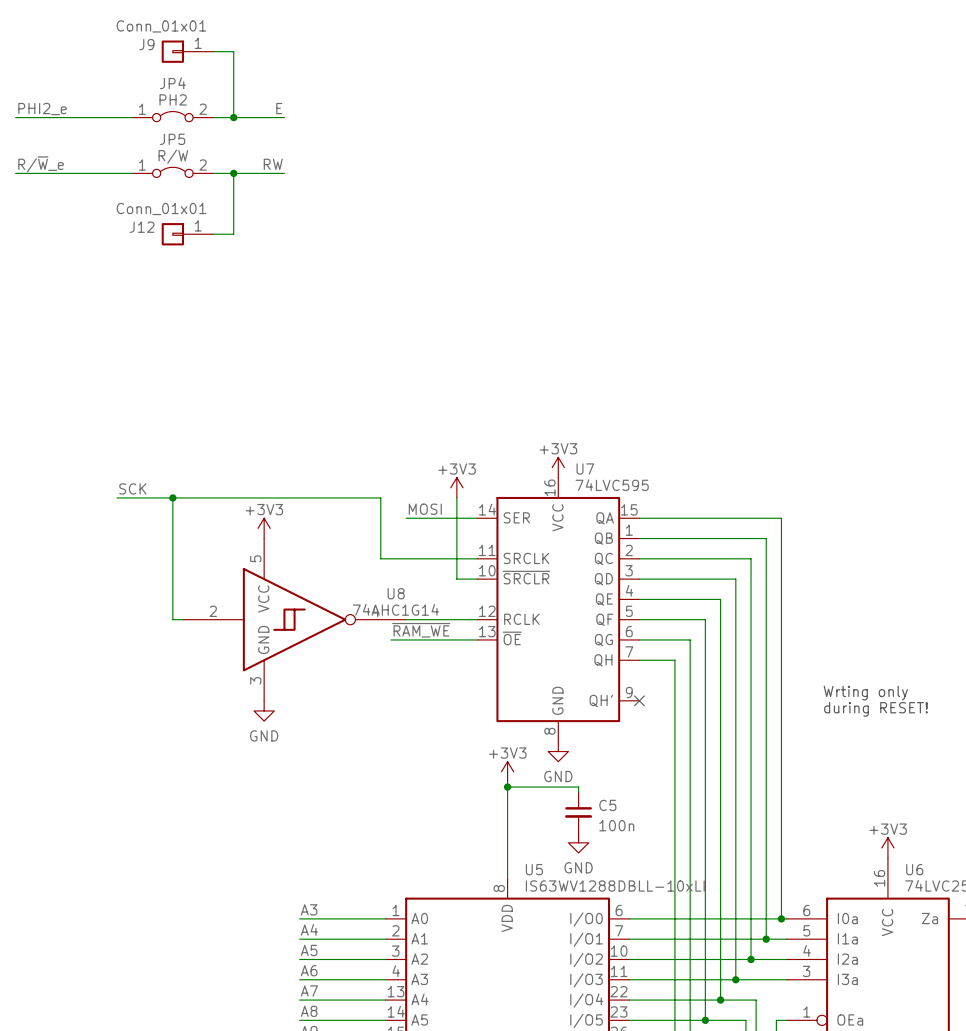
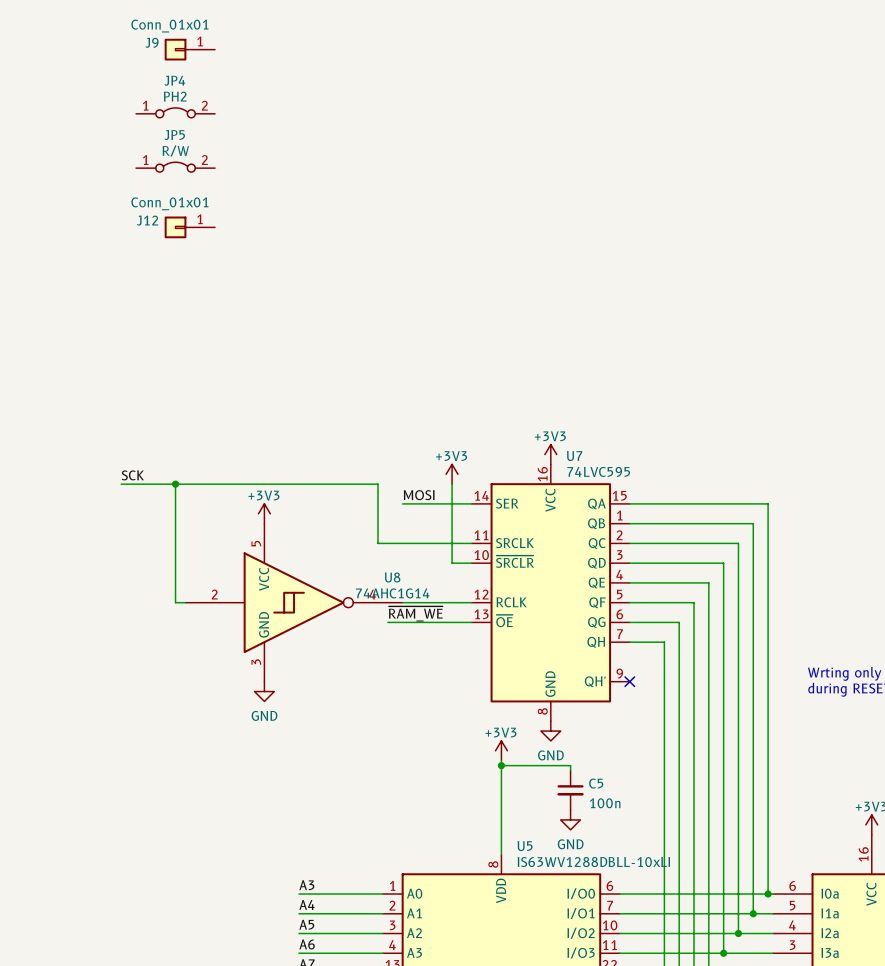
wire: (213, 51) (233, 51) (233, 117) -> none
label: E (279, 108) -> none
label: PHI2_e (42, 109) -> none
wire: (15, 117) (132, 117) -> none
wire: (213, 117) (284, 117) -> none
junction: (233, 117) -> none
label: R/~{W}_e (41, 164) -> none
label: RW (273, 164) -> none
wire: (15, 173) (132, 173) -> none
wire: (213, 173) (284, 173) -> none
wire: (233, 173) (233, 234) (213, 234) -> none
junction: (233, 173) -> none

